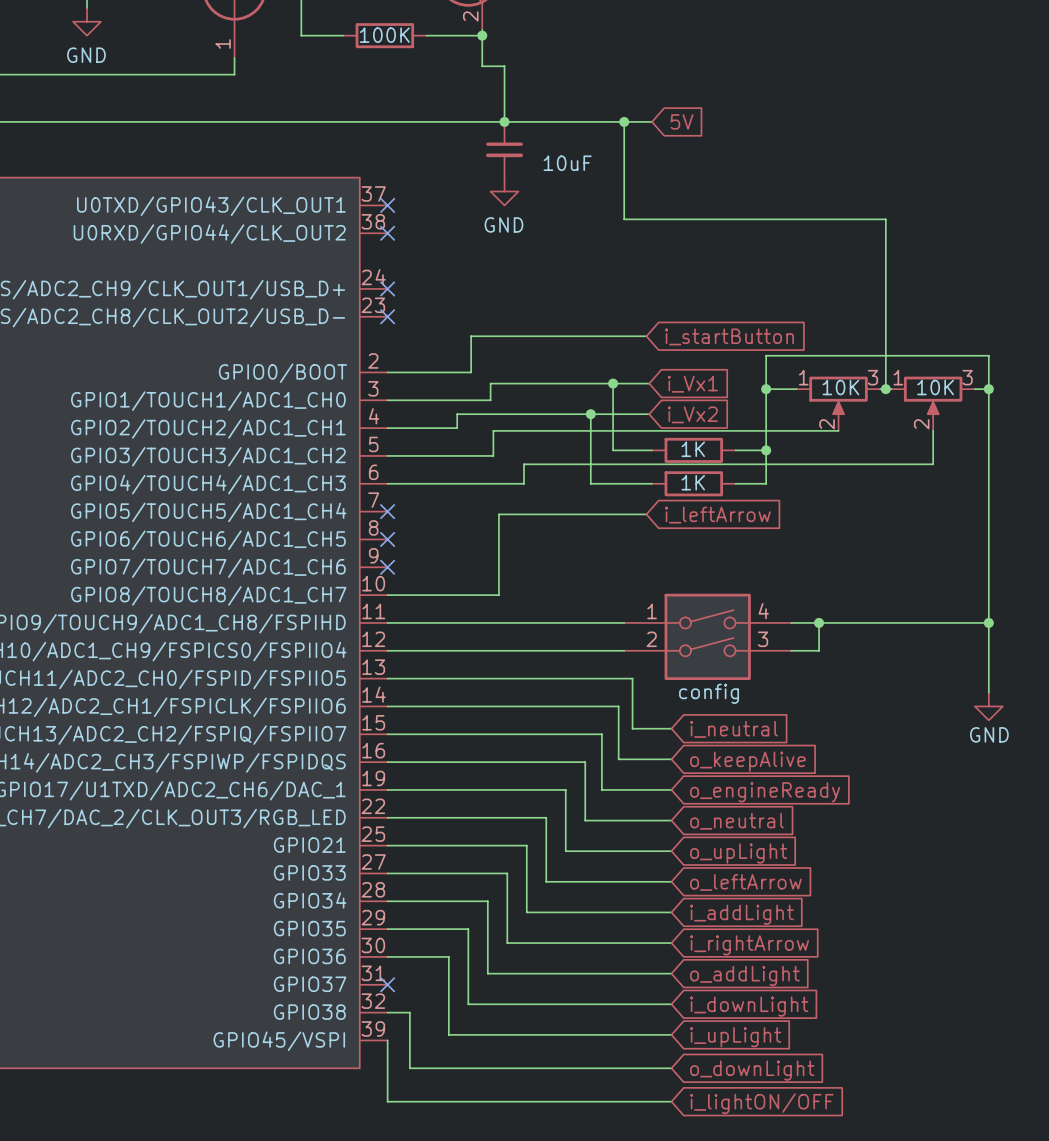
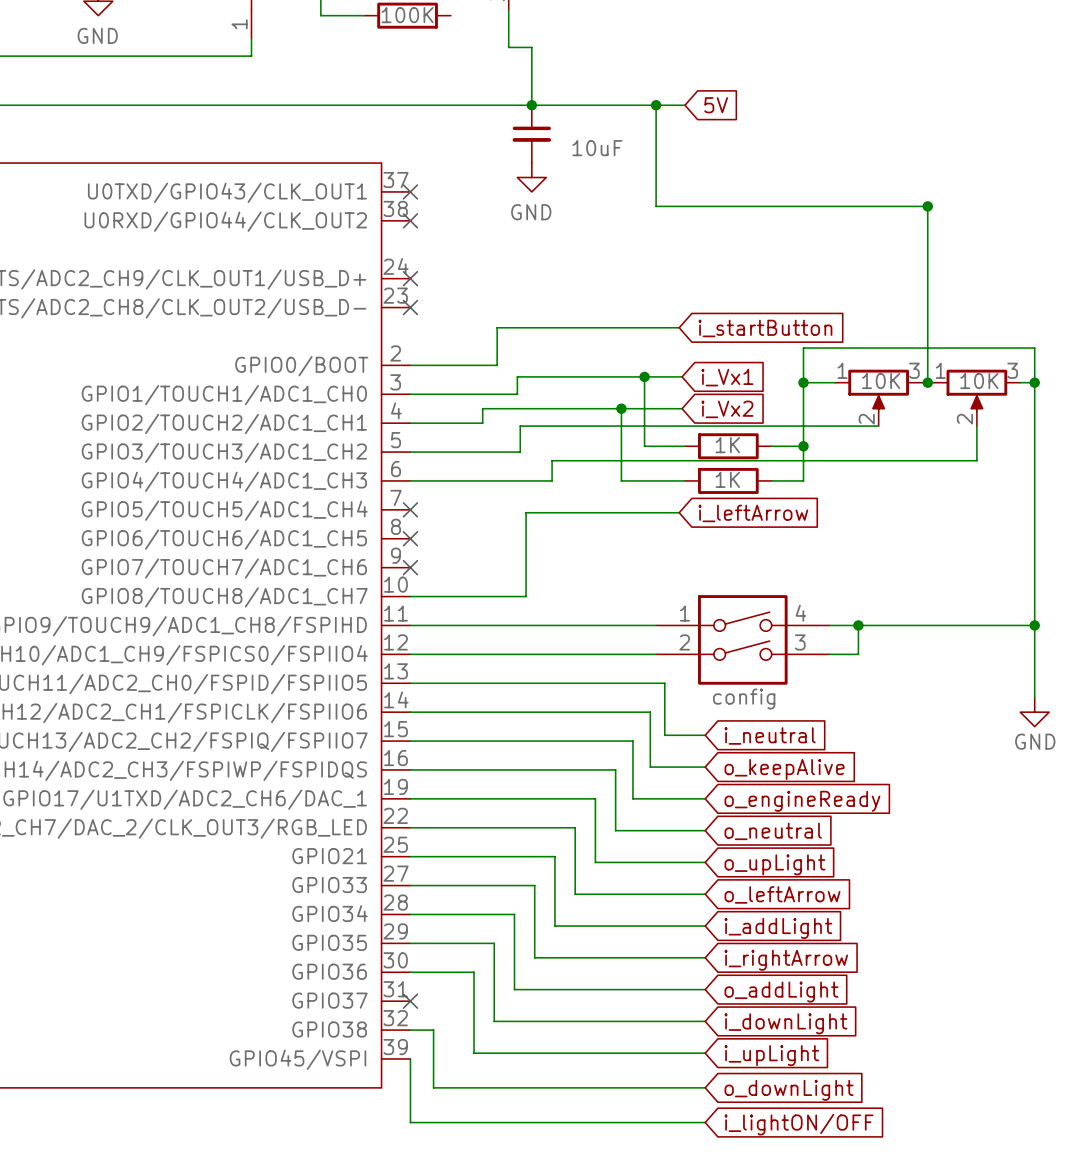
wire: (426, 35) (482, 35) -> none
junction: (482, 35) -> none
junction: none -> (927, 206)

